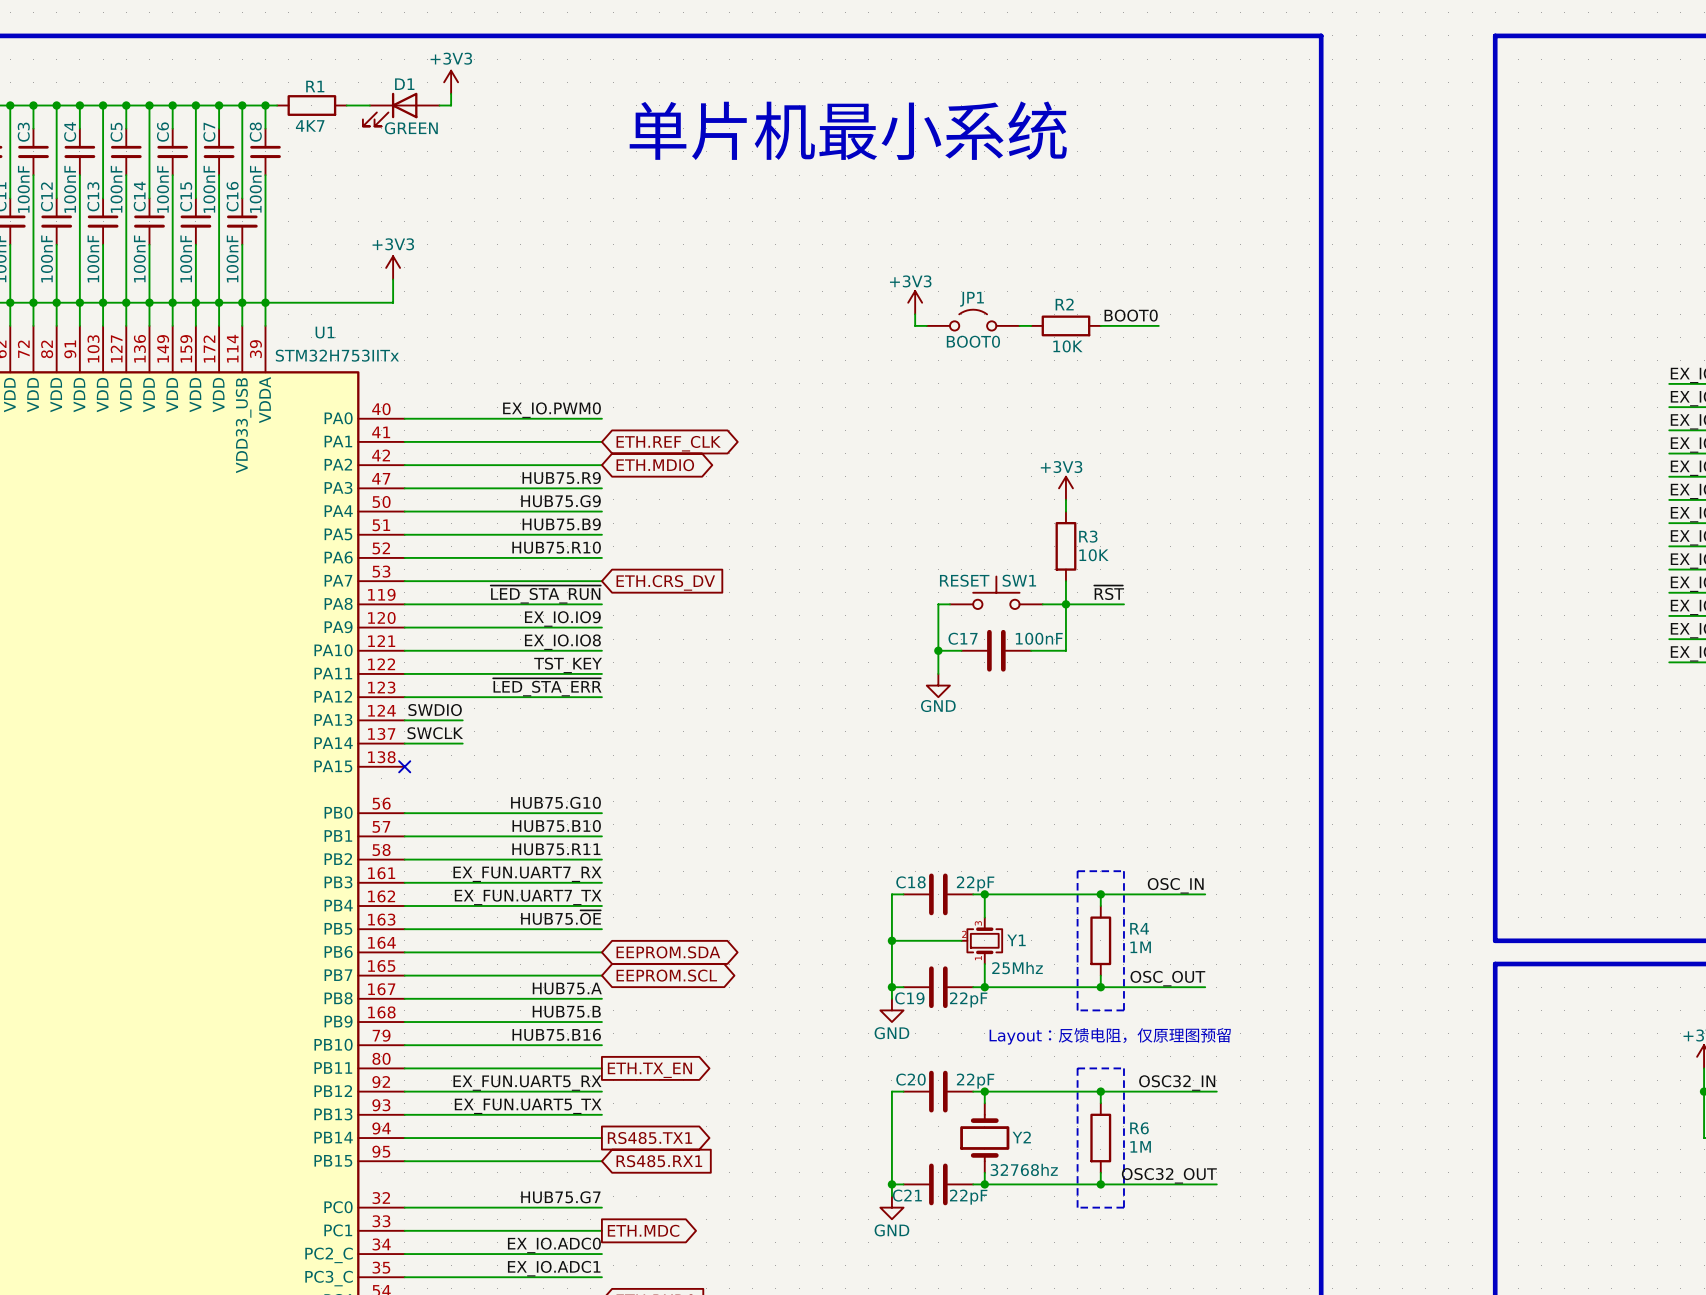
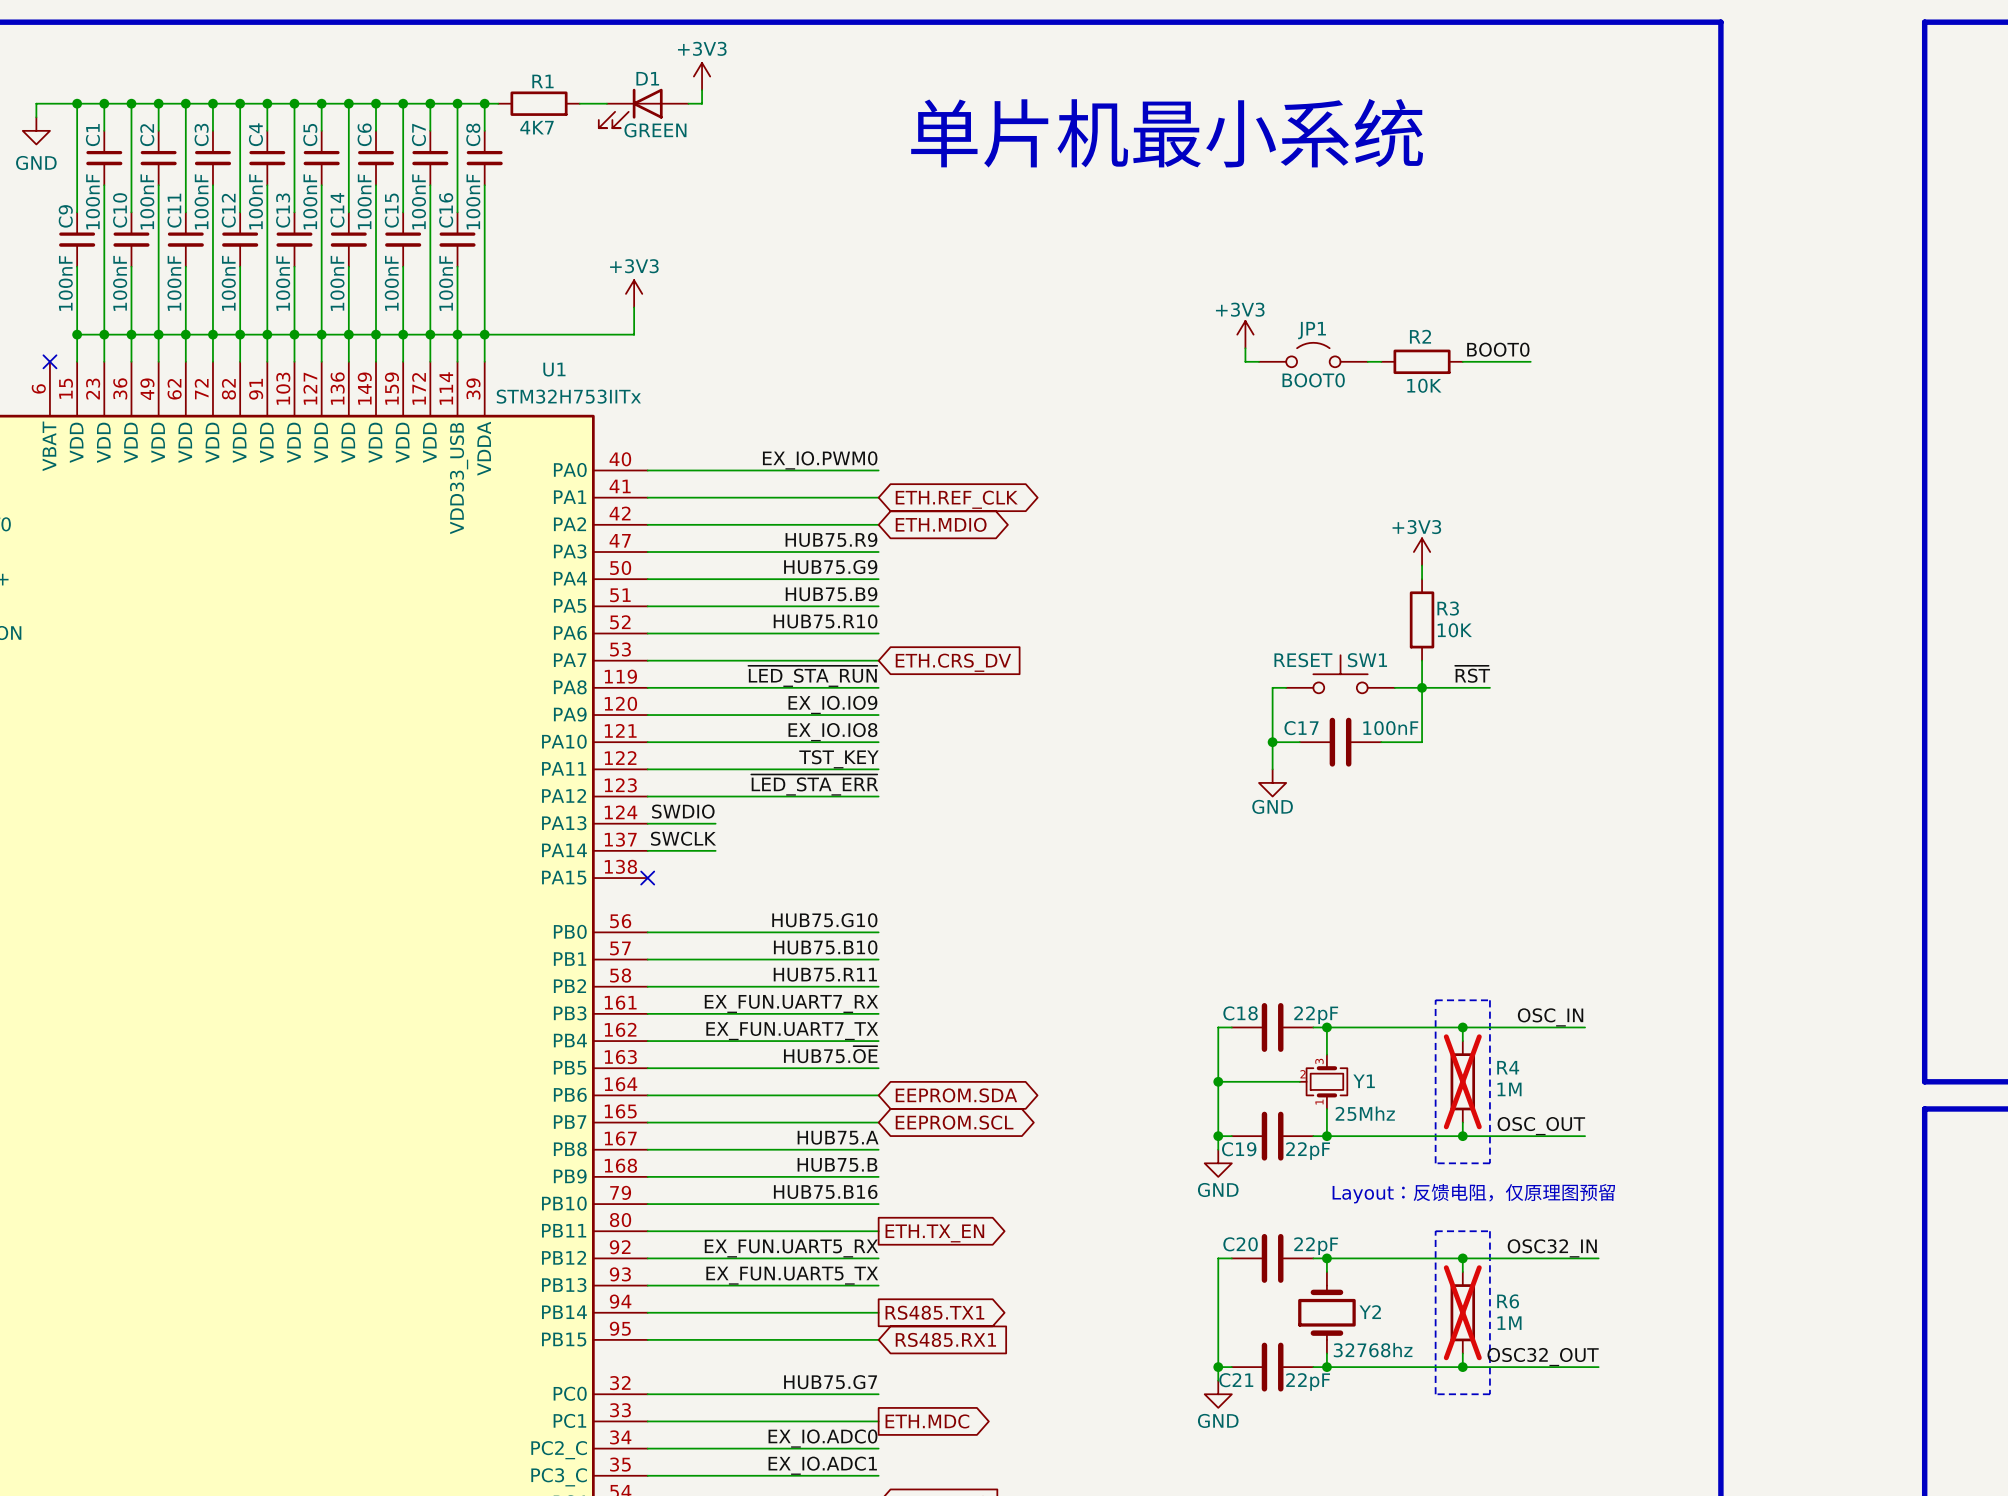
R4 do-not-place cross: none -> (1462, 1081)
R6 do-not-place cross: none -> (1462, 1312)

